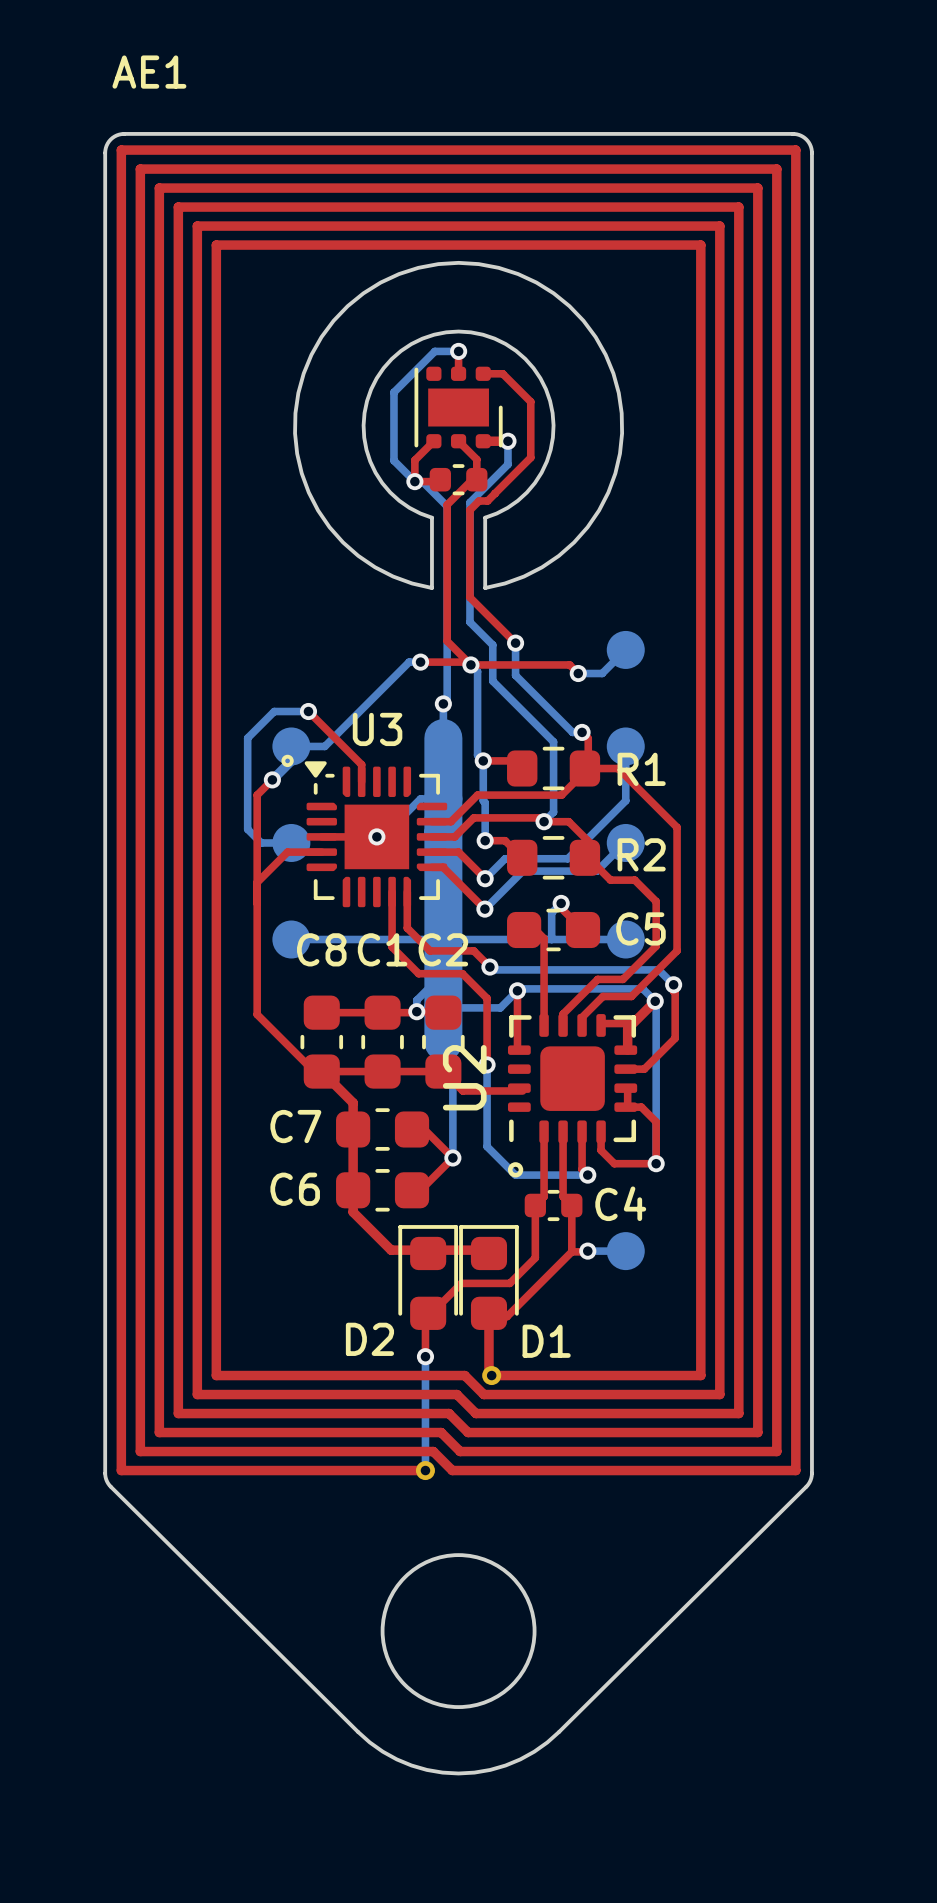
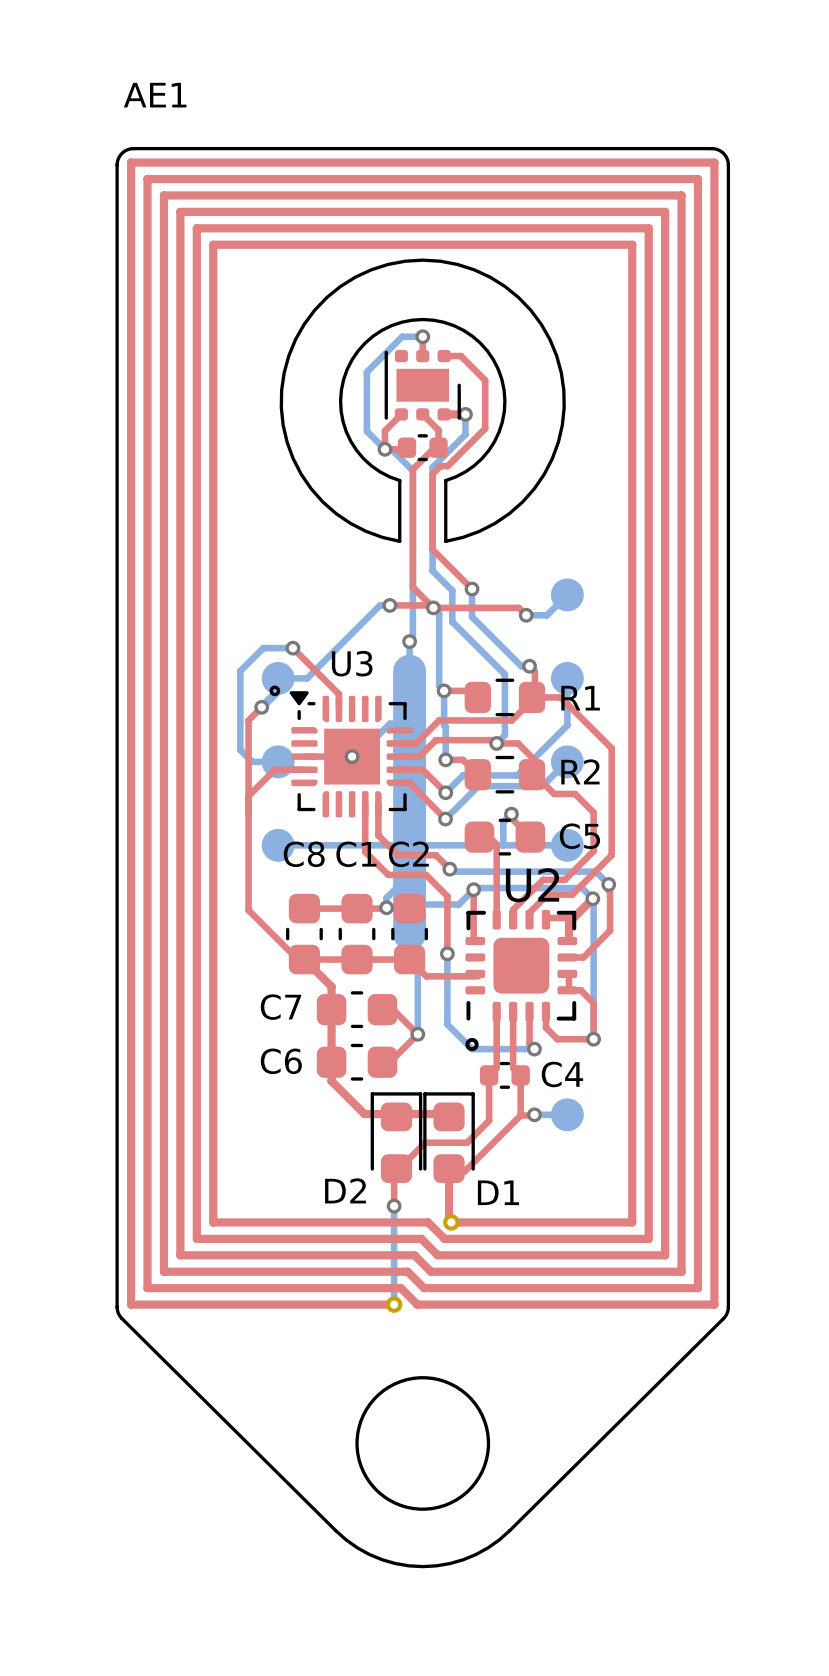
U2 name rotation: 0° (464, 1077) -> 90° clockwise (532, 885)
U2 name position: U2 (464, 1077) -> U2 (532, 885)

